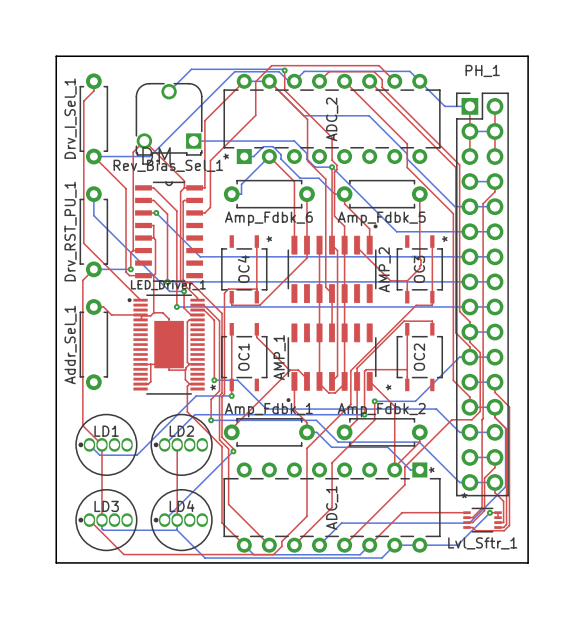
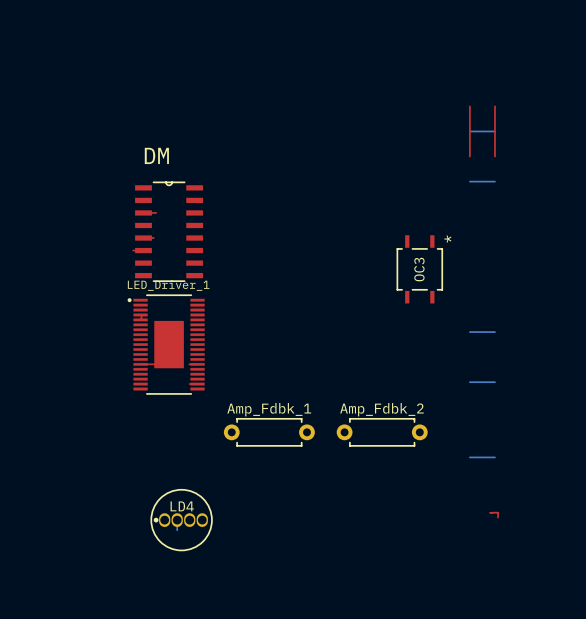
board edge: (56, 56) (528, 56) (528, 562) (56, 562) (56, 56) -> none
top track: (284, 70) (284, 90) (332, 137) (332, 160) (336, 165) (334, 172) (334, 216) (344, 226) (344, 383) (335, 392) (328, 392) (319, 383) (319, 245) -> none
bottom track: (284, 70) (191, 69) (169, 91) -> none
via: (284, 70) -> none
top track: (93, 81) (93, 91) (83, 101) (83, 243) (140, 300) -> none
top track: (244, 81) (204, 120) (204, 187) (184, 187) -> none
bottom track: (244, 81) (269, 81) (303, 115) (369, 115) (407, 154) (407, 159) (454, 206) (494, 206) -> none
top track: (269, 81) (307, 119) (307, 160) (325, 179) (325, 287) (332, 293) (332, 332) -> none
top track: (319, 81) (329, 71) (374, 71) (382, 79) (382, 87) (459, 164) (459, 311) (469, 321) (469, 342) (480, 352) (480, 411) (471, 419) (451, 419) (404, 466) (404, 484) (344, 545) -> none
top track: (344, 81) (407, 144) (407, 167) (453, 213) (453, 380) (469, 397) (469, 407) -> none
top track: (369, 81) (455, 167) (455, 332) (469, 346) (469, 357) -> none
top track: (394, 81) (379, 65) (271, 65) (255, 81) (255, 115) (210, 160) (210, 207) (204, 212) (194, 212) -> none
bottom track: (469, 106) (444, 106) (409, 71) (304, 71) (294, 81) (288, 81) (279, 71) (234, 71) (149, 156) (93, 156) -> none
Drv_I_Sel_1: (93, 118) -> none
ADC_2: (332, 118) -> none
Rev_Bias_Sel_1: (169, 119) -> none
bottom track: (193, 141) (294, 141) (306, 153) (306, 159) (315, 167) (332, 167) (396, 231) (494, 231) -> none
top track: (93, 156) (126, 188) (126, 272) (129, 275) (153, 275) -> none
bottom track: (244, 156) (253, 156) (263, 146) (273, 146) (281, 154) (281, 159) (300, 178) (318, 178) (334, 194) (344, 194) -> none
top track: (269, 156) (294, 181) (294, 245) -> none
bottom track: (269, 156) (241, 184) (241, 194) (231, 194) -> none
top track: (332, 167) (332, 245) (337, 250) (337, 375) (332, 381) -> none
via: (332, 167) -> none
top track: (494, 181) (494, 191) (483, 203) (482, 508) (472, 517) (466, 517) -> none
top track: (143, 187) (153, 187) (176, 210) (176, 306) -> none
top track: (184, 187) (184, 181) (144, 141) (133, 152) (133, 250) (130, 252) (130, 269) -> none
top track: (184, 187) (180, 191) (180, 281) (197, 300) -> none
bottom track: (93, 194) (93, 215) (169, 291) (184, 291) -> none
Amp_Fdbk_6: (269, 194) -> none
top track: (306, 194) (306, 258) (259, 305) (231, 305) (231, 297) -> none
top track: (344, 194) (344, 203) (369, 228) (369, 245) -> none
Amp_Fdbk_5: (382, 194) -> none
top track: (419, 194) (420, 265) (407, 280) -> none
top track: (143, 200) (153, 200) (167, 214) (167, 281) -> none
top track: (194, 200) (183, 201) (183, 279) (186, 282) (191, 282) (222, 313) (222, 393) (219, 395) (219, 439) (228, 449) (228, 504) (269, 545) -> none
bottom track: (156, 212) (200, 256) (494, 256) -> none
via: (156, 212) -> none
top track: (143, 225) (153, 225) (153, 238) (155, 239) (155, 273) (153, 275) -> none
Drv_RST_PU_1: (93, 231) -> none
top track: (256, 241) (256, 297) -> none
top track: (432, 241) (432, 305) (416, 305) (350, 370) (350, 404) (306, 448) (306, 516) (281, 541) (281, 546) (273, 554) (123, 554) (89, 520) -> none
top track: (357, 245) (357, 247) (390, 280) (407, 280) -> none
AMP_2: (332, 263) -> none
top track: (93, 269) (82, 280) (82, 425) (101, 444) (101, 520) -> none
bottom track: (93, 269) (130, 269) -> none
via: (130, 269) -> none
OC4: (244, 269) -> none
top track: (153, 275) (153, 312) -> none
top track: (407, 280) (407, 297) -> none
bottom track: (167, 281) (494, 281) -> none
via: (167, 281) -> none
top track: (256, 289) (228, 289) (224, 293) (224, 394) (222, 396) (222, 437) (233, 448) (233, 451) -> none
top track: (184, 291) (184, 308) (190, 314) (197, 314) -> none
via: (184, 291) -> none
PH_1: (482, 294) -> none
top track: (197, 305) (203, 305) (219, 320) (219, 391) (211, 399) (211, 420) -> none
top track: (93, 306) (103, 306) (111, 314) (150, 315) (153, 312) -> none
bottom track: (176, 306) (494, 306) -> none
via: (176, 306) -> none
top track: (197, 310) (204, 310) (214, 320) (214, 380) -> none
top track: (153, 312) (162, 312) (169, 319) (169, 370) (185, 370) -> none
top track: (197, 319) (189, 319) (187, 321) (187, 362) (189, 364) (185, 370) -> none
top track: (231, 329) (231, 396) -> none
top track: (256, 329) (256, 337) (289, 370) -> none
top track: (407, 329) (407, 384) -> none
top track: (432, 329) (432, 321) (404, 321) (357, 368) (357, 419) (344, 432) -> none
Addr_Sel_1: (93, 344) -> none
OC1: (244, 357) -> none
OC2: (419, 357) -> none
bottom track: (494, 357) (459, 357) (415, 401) (374, 401) -> none
AMP_1: (331, 362) -> none
top track: (150, 364) (150, 381) (148, 384) (140, 384) -> none
top track: (407, 369) (366, 369) (364, 371) (364, 414) -> none
top track: (185, 370) (185, 379) (189, 384) (187, 386) (187, 411) (222, 446) (222, 522) (244, 545) -> none
bottom track: (214, 380) (237, 380) (266, 409) (436, 409) (459, 432) (494, 432) -> none
via: (214, 380) -> none
top track: (294, 381) (294, 410) (306, 422) (306, 432) -> none
top track: (306, 381) (306, 378) (298, 370) (290, 370) (231, 428) (231, 432) -> none
top track: (369, 381) (394, 406) (394, 469) -> none
top track: (494, 382) (494, 392) (509, 406) (509, 525) (504, 530) (475, 530) (472, 527) (466, 527) -> none
bottom track: (231, 396) (196, 396) (137, 455) (99, 455) (89, 444) -> none
via: (231, 396) -> none
top track: (374, 401) (374, 420) (332, 462) (332, 507) (294, 545) -> none
via: (374, 401) -> none
bottom track: (469, 407) (494, 407) (494, 417) (505, 428) (505, 486) (469, 523) (341, 523) (319, 545) -> none
top track: (494, 407) (494, 417) (506, 429) (506, 524) (503, 527) (498, 527) -> none
bottom track: (364, 414) (194, 414) (164, 444) -> none
via: (364, 414) -> none
bottom track: (211, 420) (316, 420) (338, 442) (419, 442) (459, 482) (494, 482) -> none
via: (211, 420) -> none
bottom track: (306, 432) (316, 432) (331, 447) (387, 447) (410, 469) (419, 469) -> none
top track: (419, 432) (419, 442) (394, 467) -> none
LD1: (106, 444) -> none
top track: (177, 444) (177, 520) -> none
LD2: (181, 444) -> none
bottom track: (233, 451) (164, 520) -> none
via: (233, 451) -> none
top track: (494, 457) (494, 467) (484, 478) (484, 510) (472, 522) (466, 522) -> none
top track: (494, 482) (494, 492) (503, 501) (503, 522) (498, 522) -> none
ADC_1: (332, 507) -> none
top track: (466, 512) (402, 512) (369, 545) -> none
bottom track: (489, 512) (457, 545) (394, 545) (381, 558) (204, 558) (177, 530) (103, 530) (101, 520) -> none
via: (489, 512) -> none
LD3: (106, 520) -> none
Lvl_Sftr_1: (482, 520) -> none
bottom track: (244, 545) (253, 554) (360, 554) (369, 545) -> none

